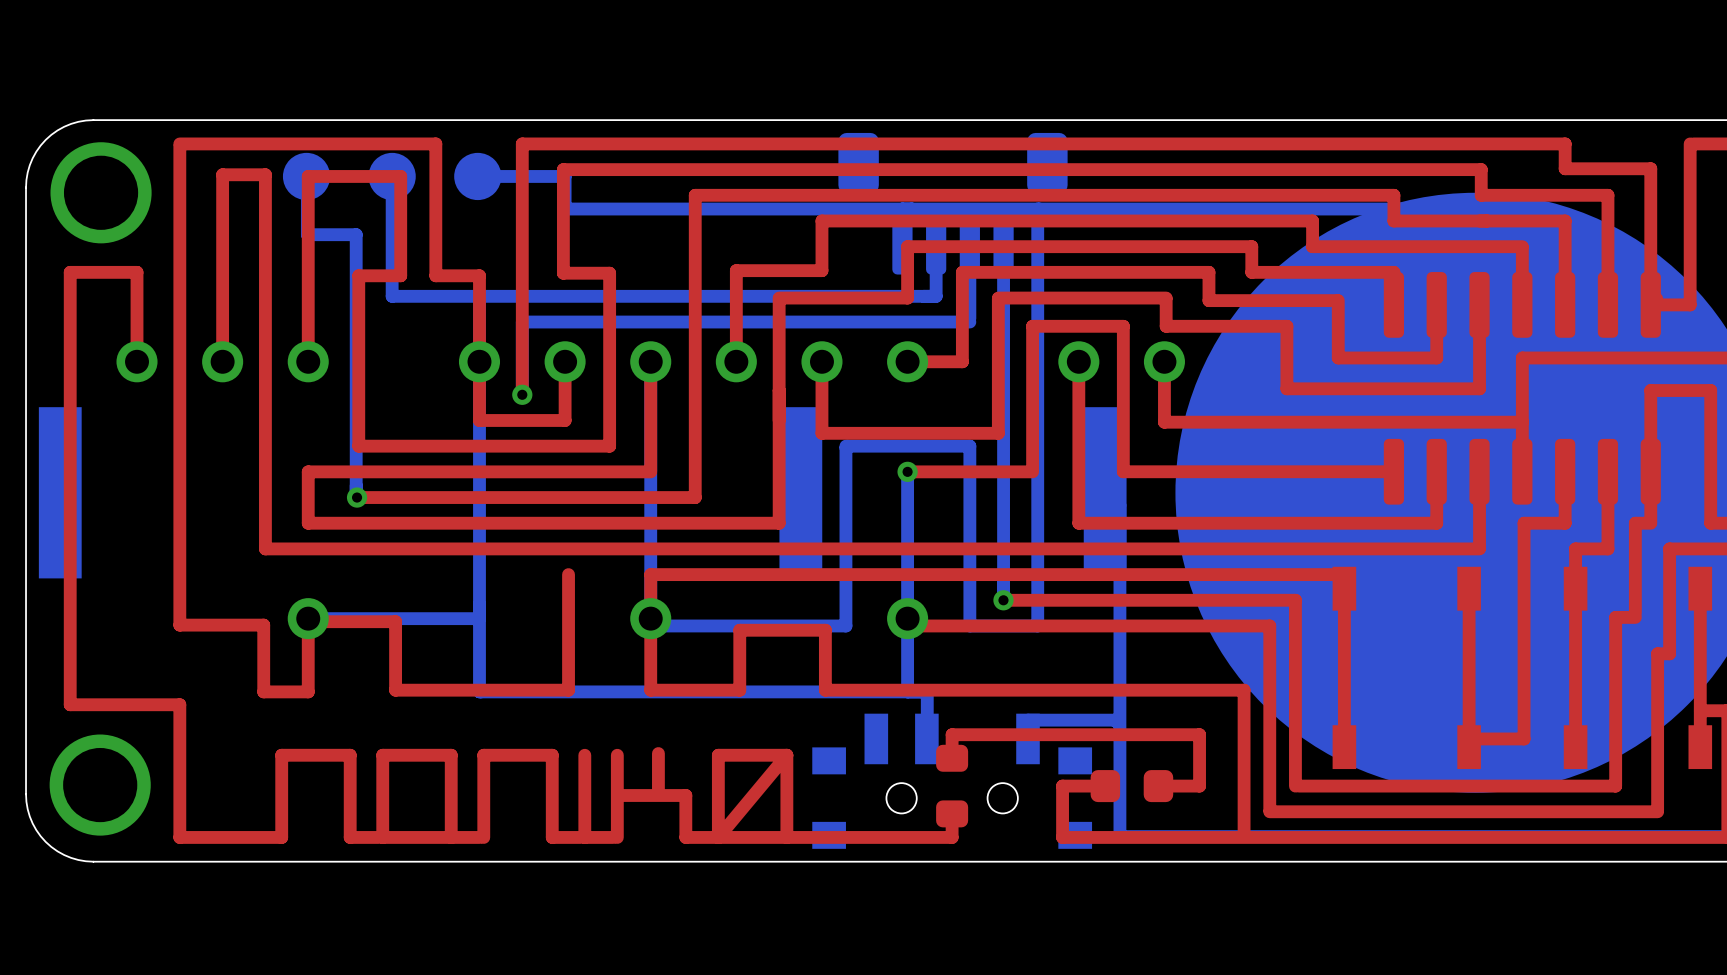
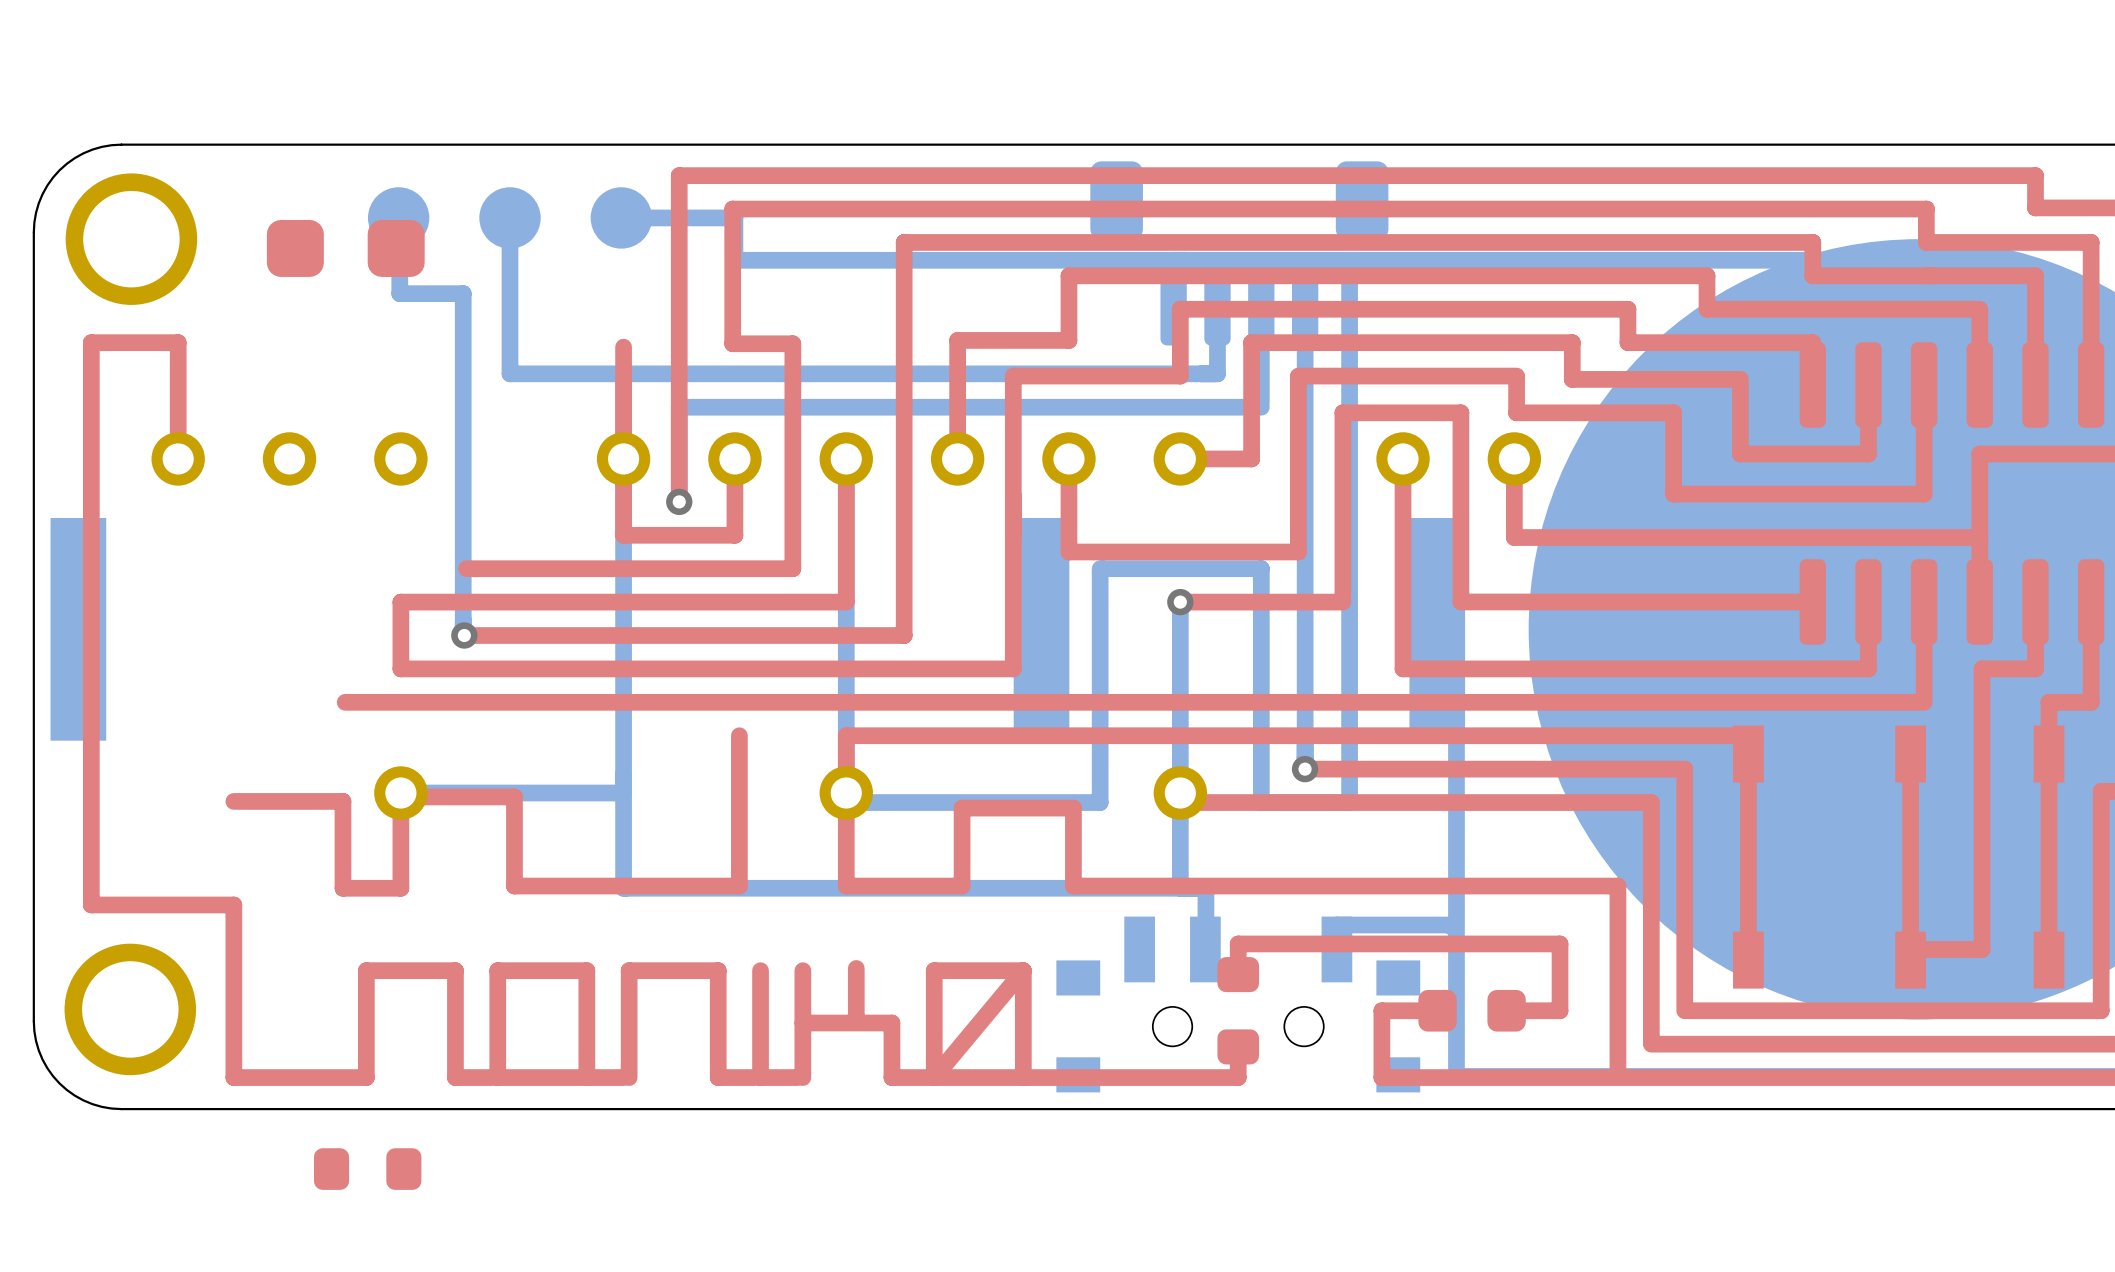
top track: (179, 143) (435, 143) (435, 275) (479, 275) -> none
top track: (179, 146) (179, 625) -> none
part: none -> (345, 248)
top track: (222, 361) (222, 174) (265, 174) (265, 548) -> none
top track: (308, 361) (308, 176) (400, 176) (400, 275) (358, 275) (358, 446) -> none
part: none -> (367, 1169)

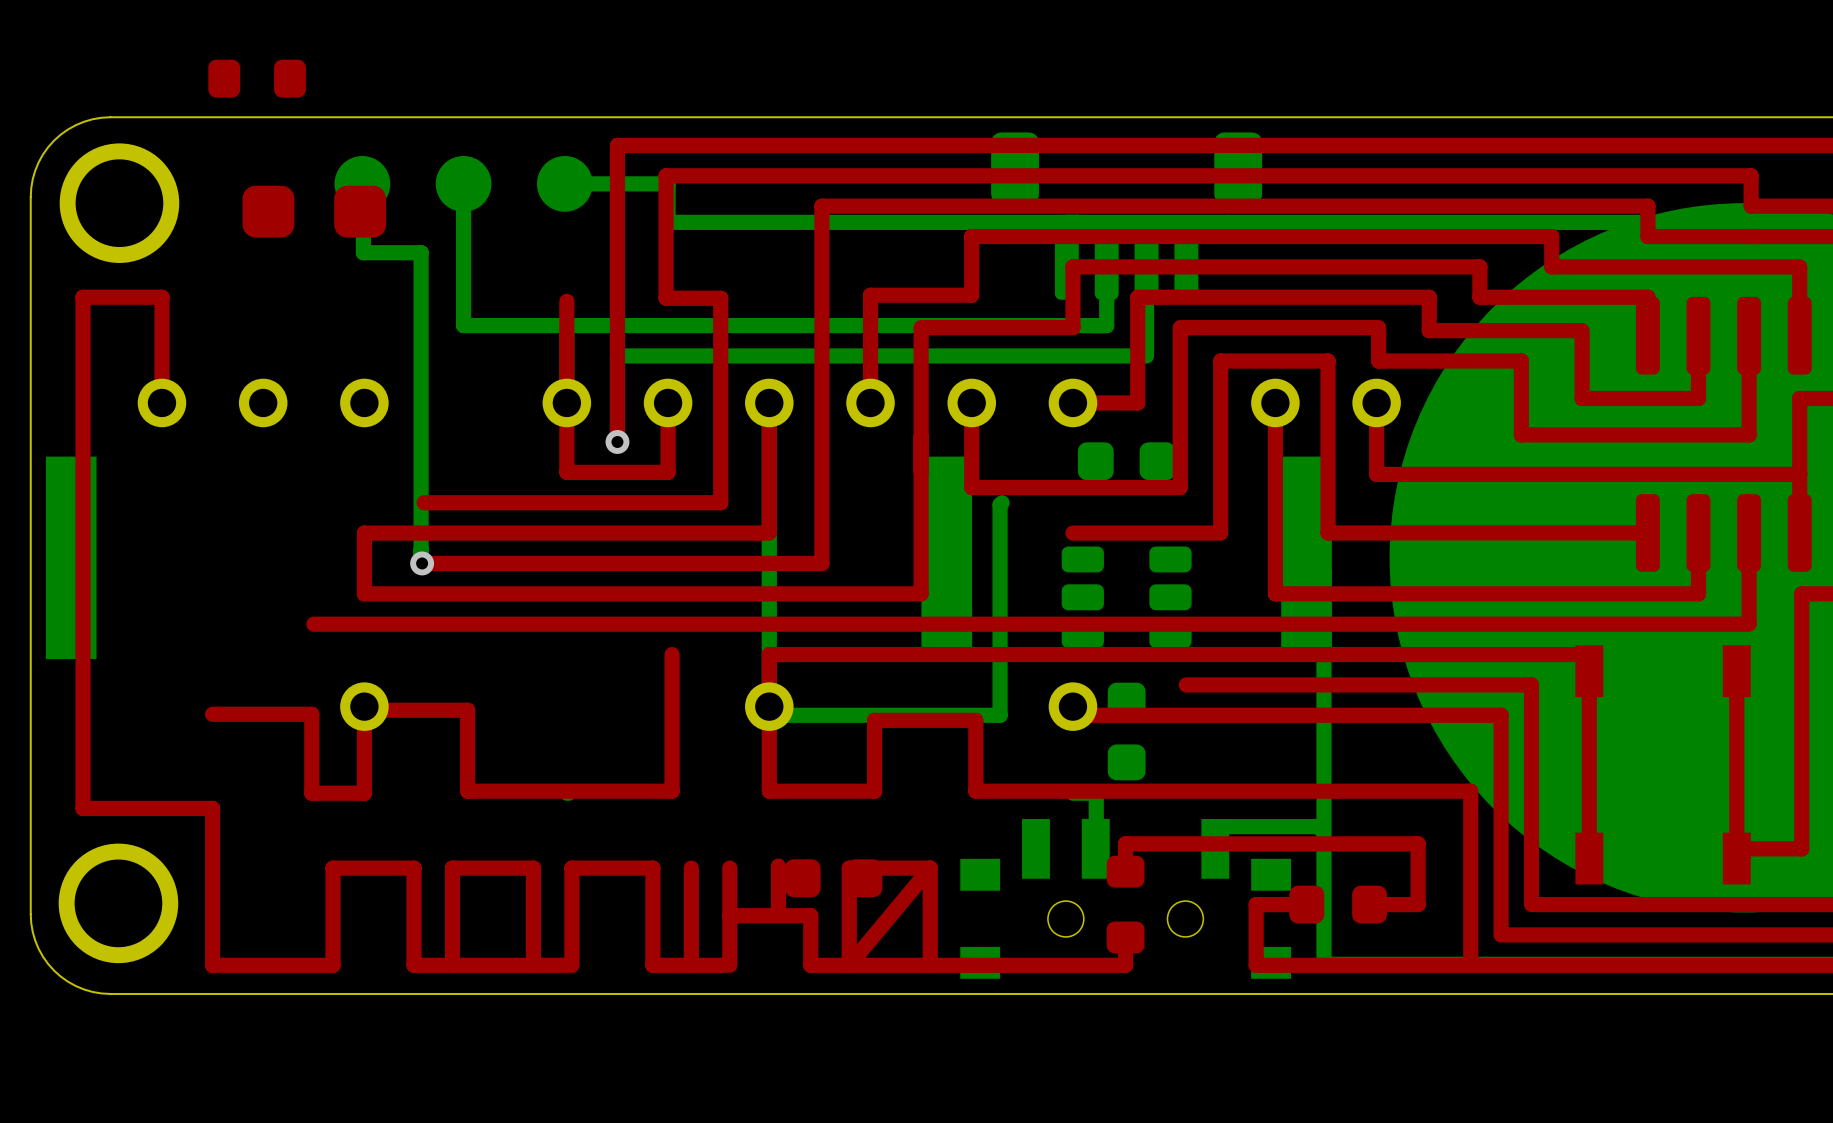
bottom track: (1349, 260) (1349, 802) (1261, 802) (1261, 568) (1100, 568) -> none
bottom track: (623, 458) (623, 888) -> none
part: none -> (1126, 461)
bottom track: (1180, 602) (1180, 888) (625, 888) -> none
via: (1180, 602) -> none
part: none -> (1126, 597)
via: (1305, 769) -> none
bottom track: (400, 793) (623, 793) -> none
part: none -> (1126, 731)
part: none -> (833, 878)
part position: (367, 1169) -> (257, 78)

